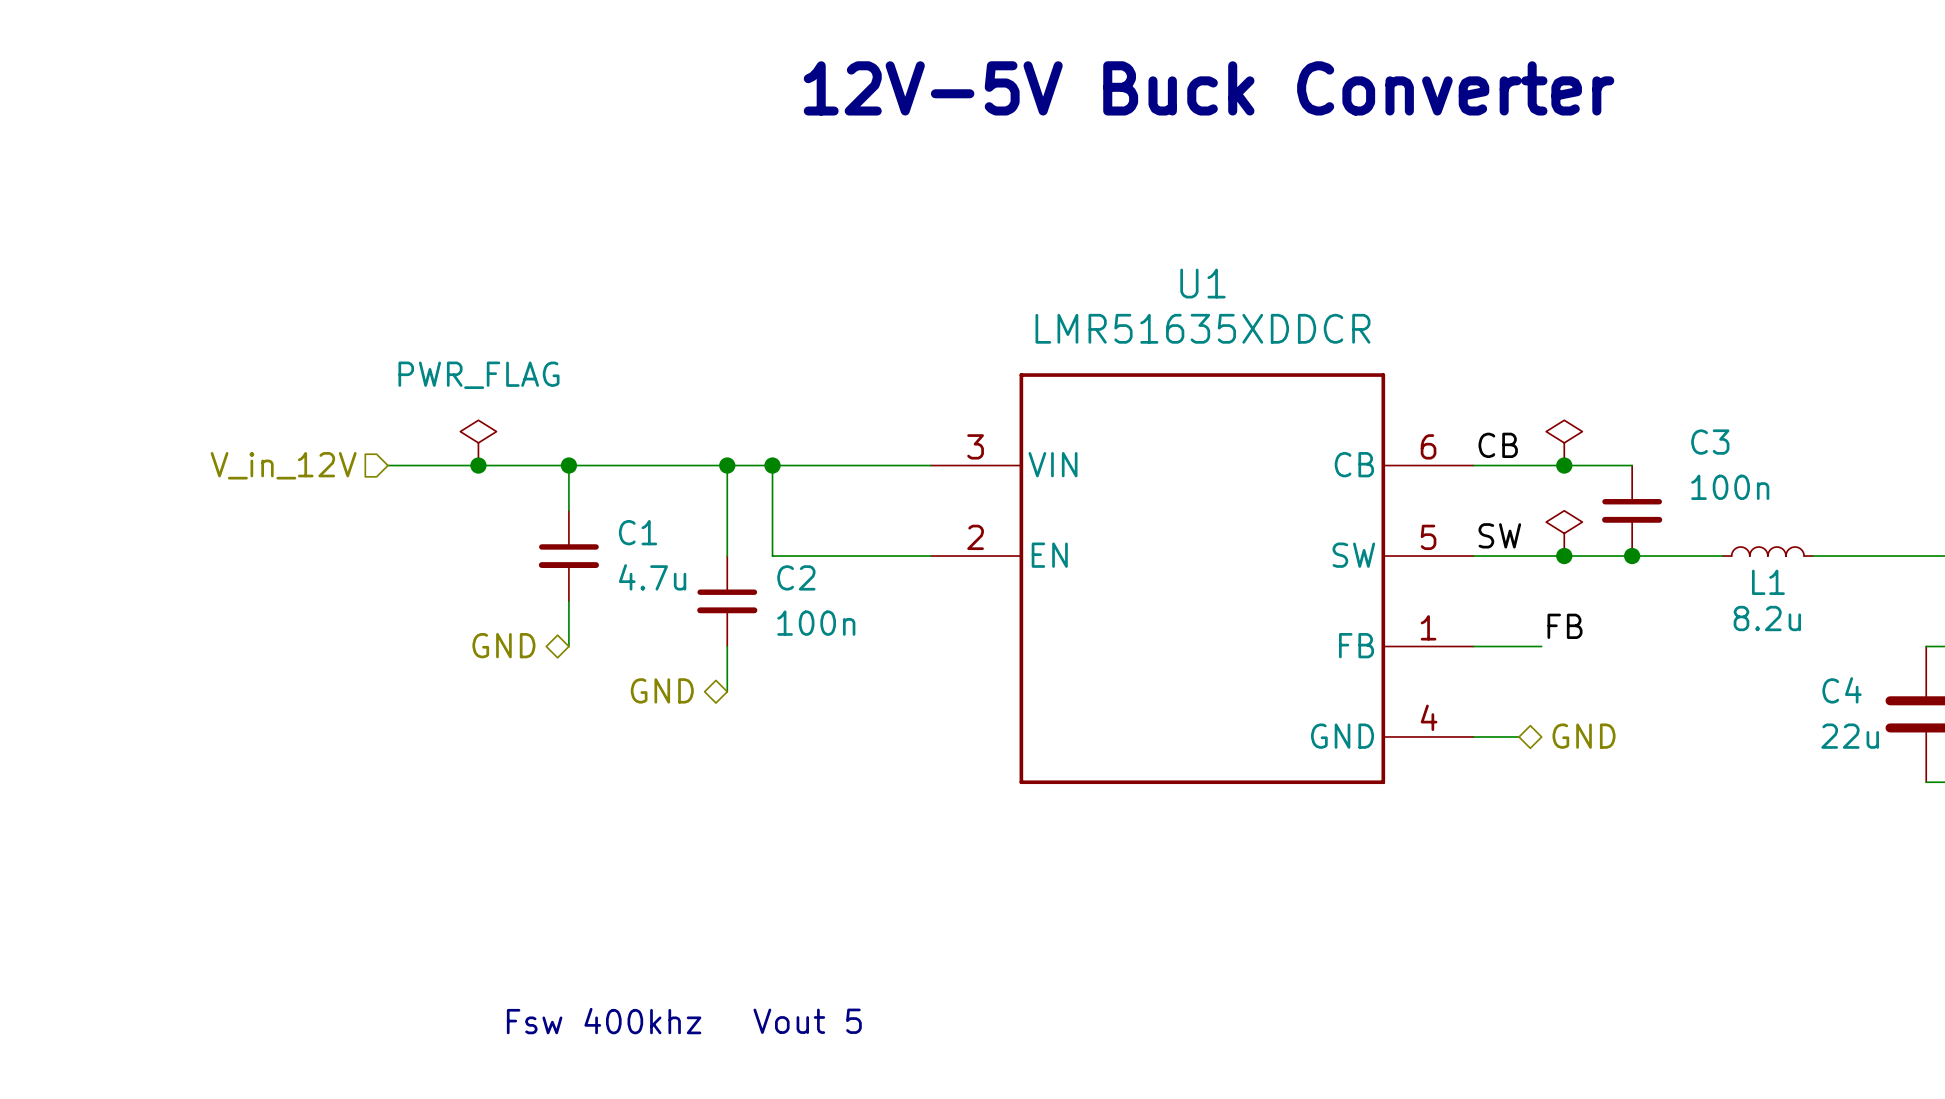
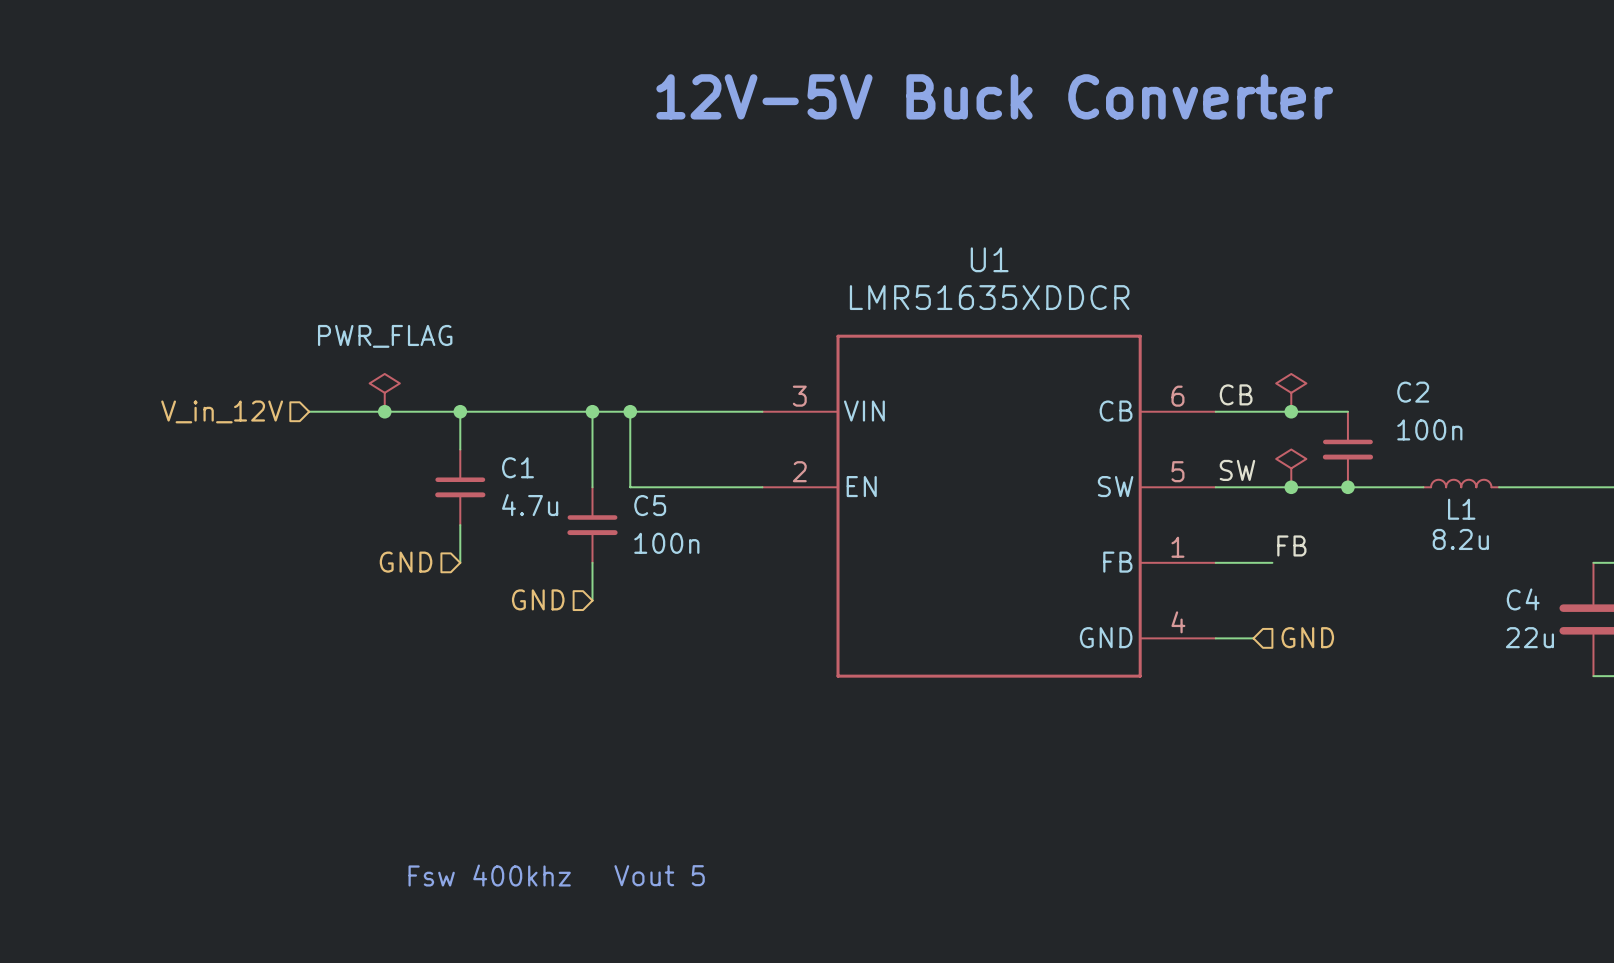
C3 name: C3 (1710, 442) -> C2 (1413, 392)
C2 name: C2 (796, 577) -> C5 (650, 505)
hierarchical label shape: bidirectional (503, 645) -> input (406, 562)
hierarchical label shape: bidirectional (662, 690) -> input (538, 599)
hierarchical label shape: bidirectional (1584, 736) -> input (1307, 637)

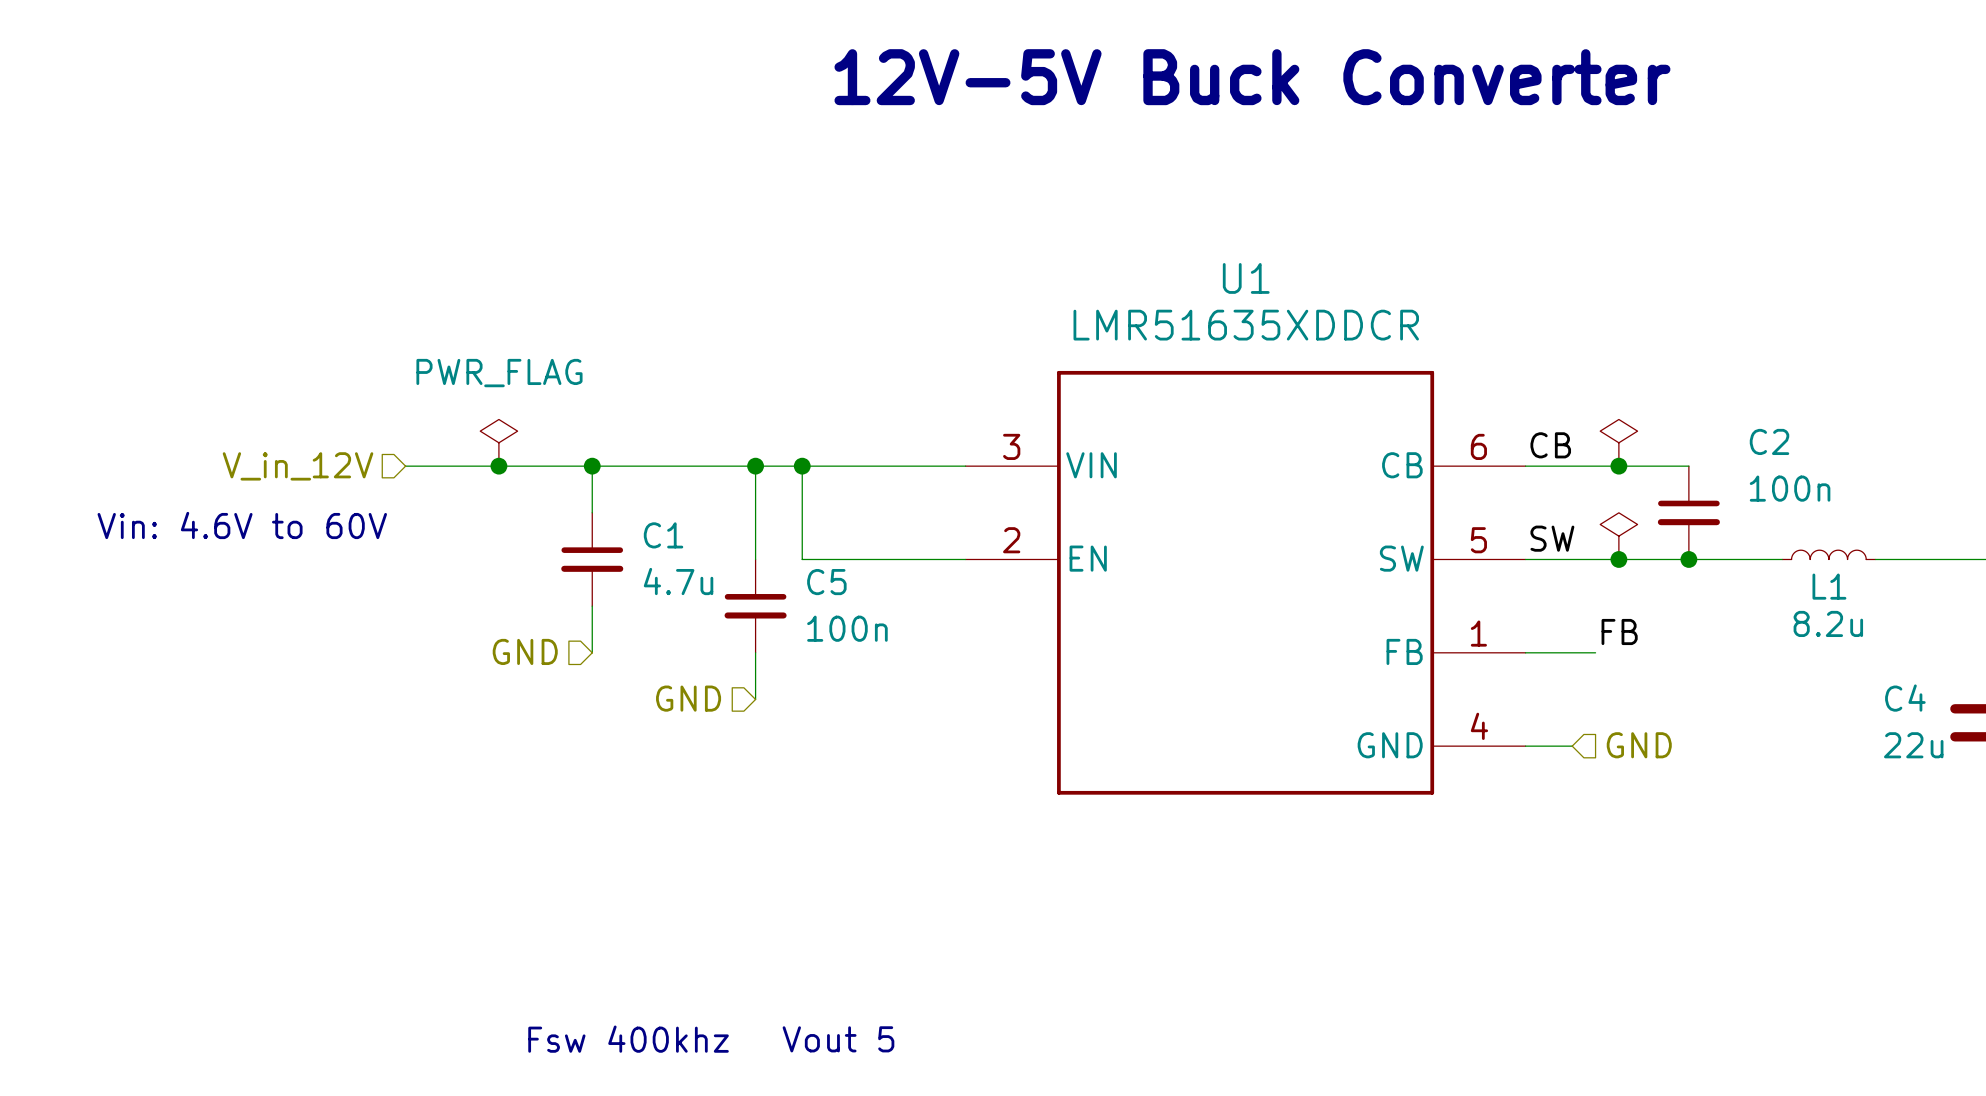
text: none -> Vin: 4.6V to 60V (242, 525)

